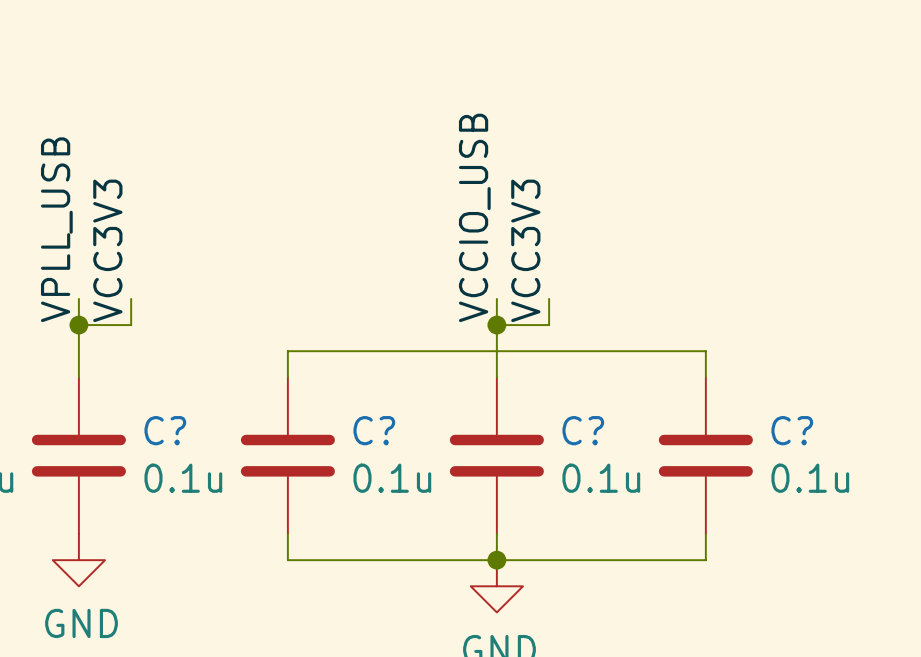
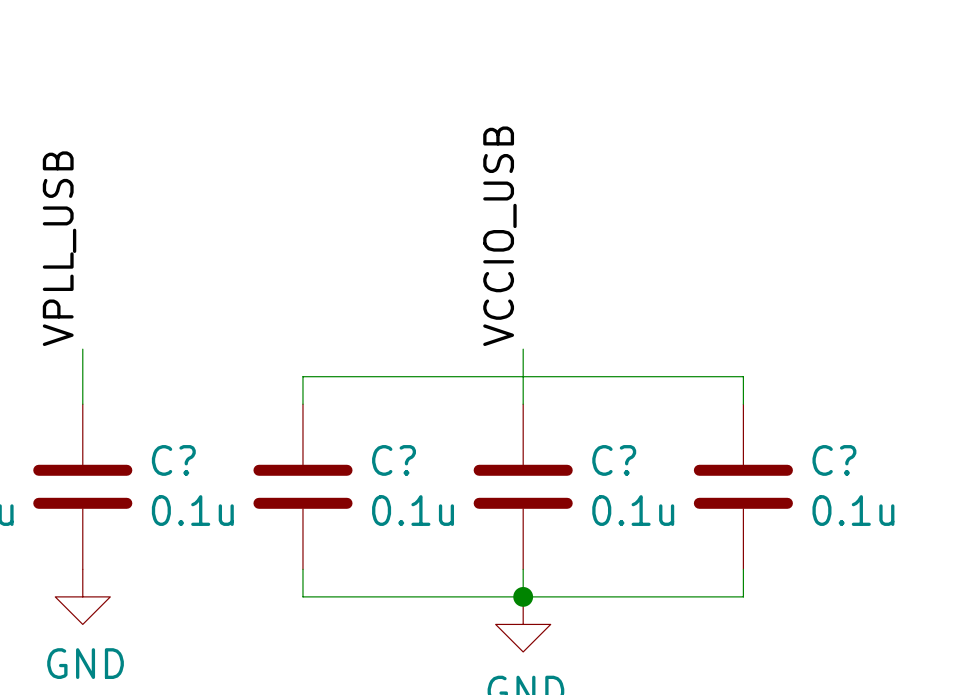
label: VCC3V3 (107, 250) -> none
label: VCC3V3 (525, 250) -> none
wire: (78, 298) (78, 325) (131, 325) (131, 298) -> none
wire: (496, 298) (496, 325) (549, 325) (549, 298) -> none
junction: (78, 325) -> none
junction: (496, 325) -> none

